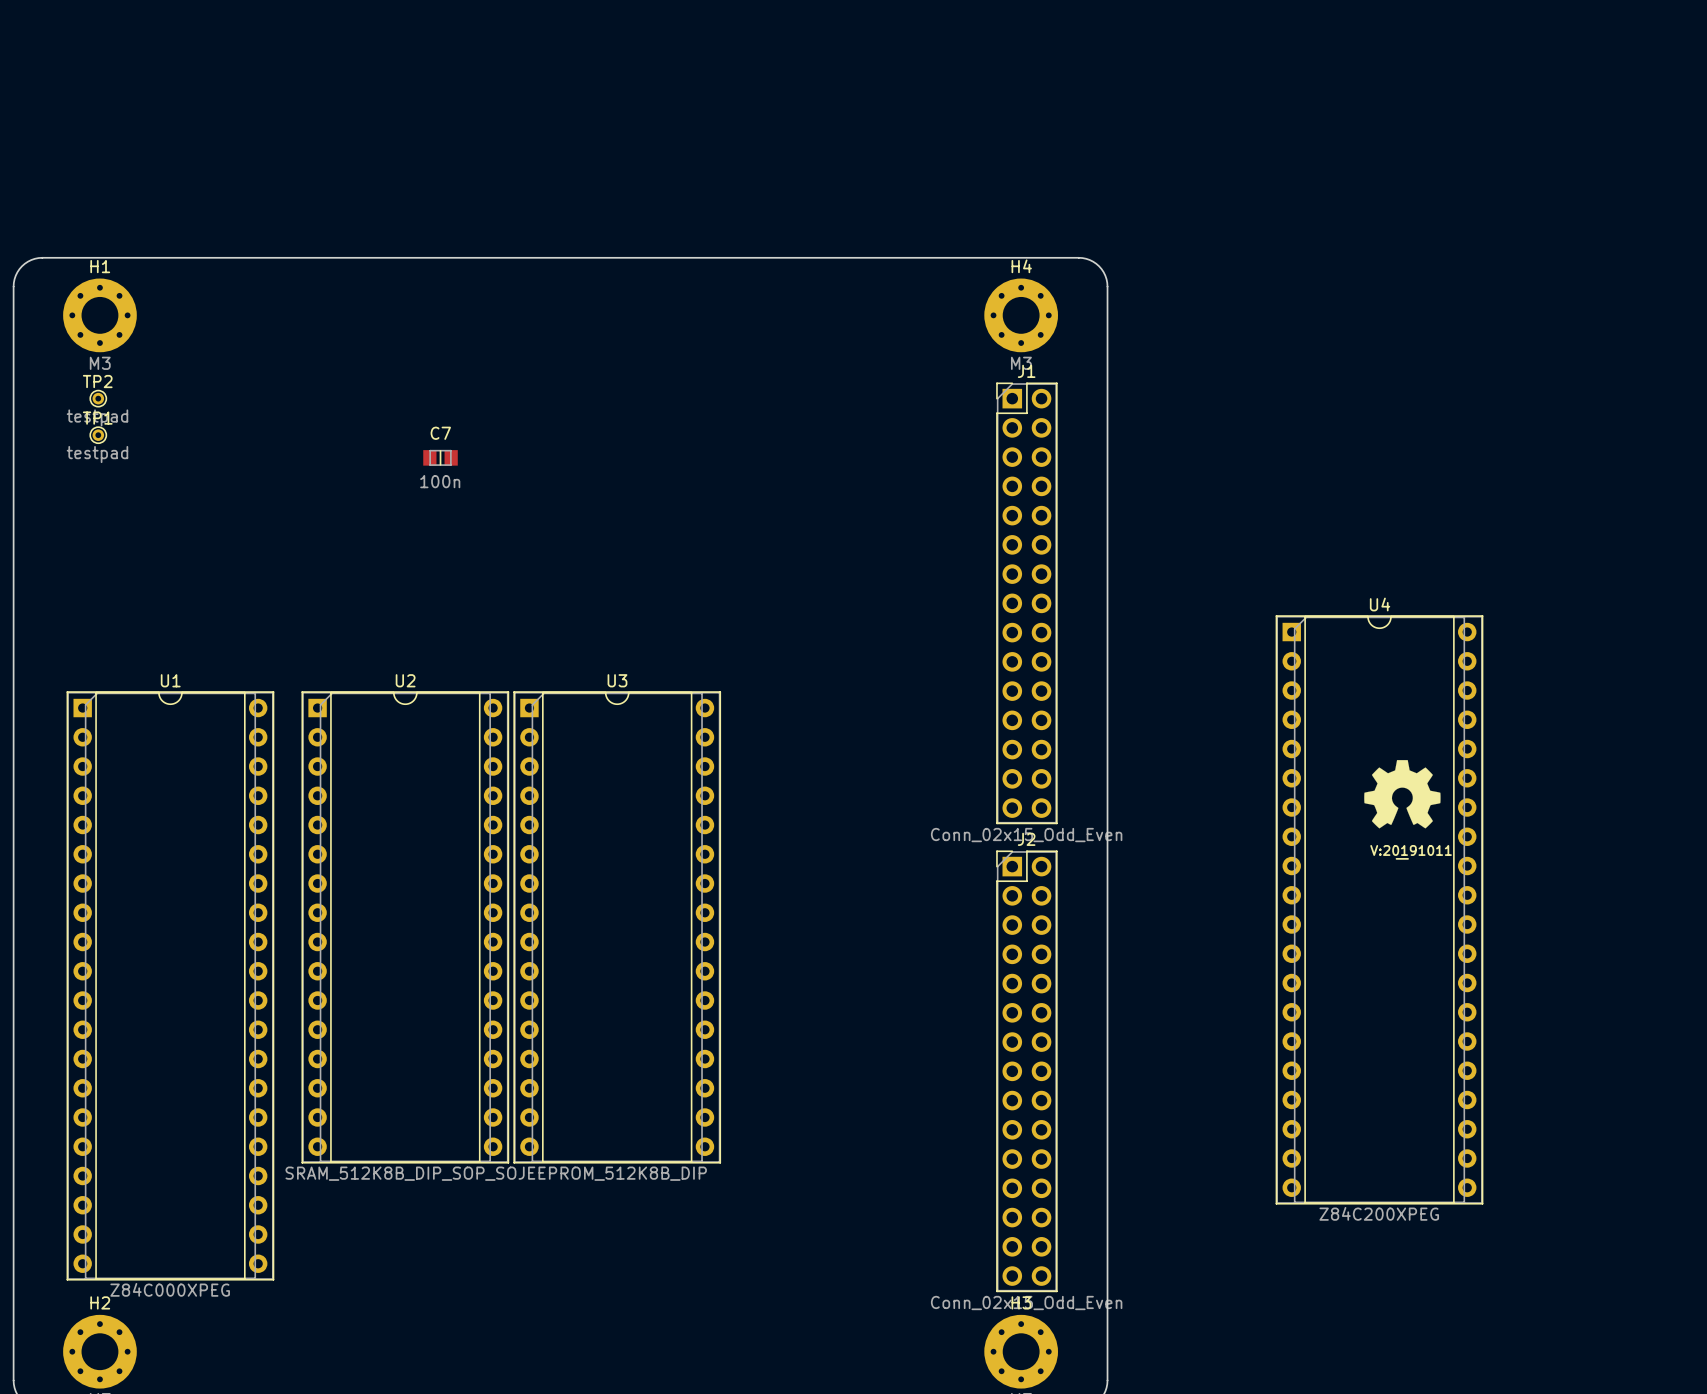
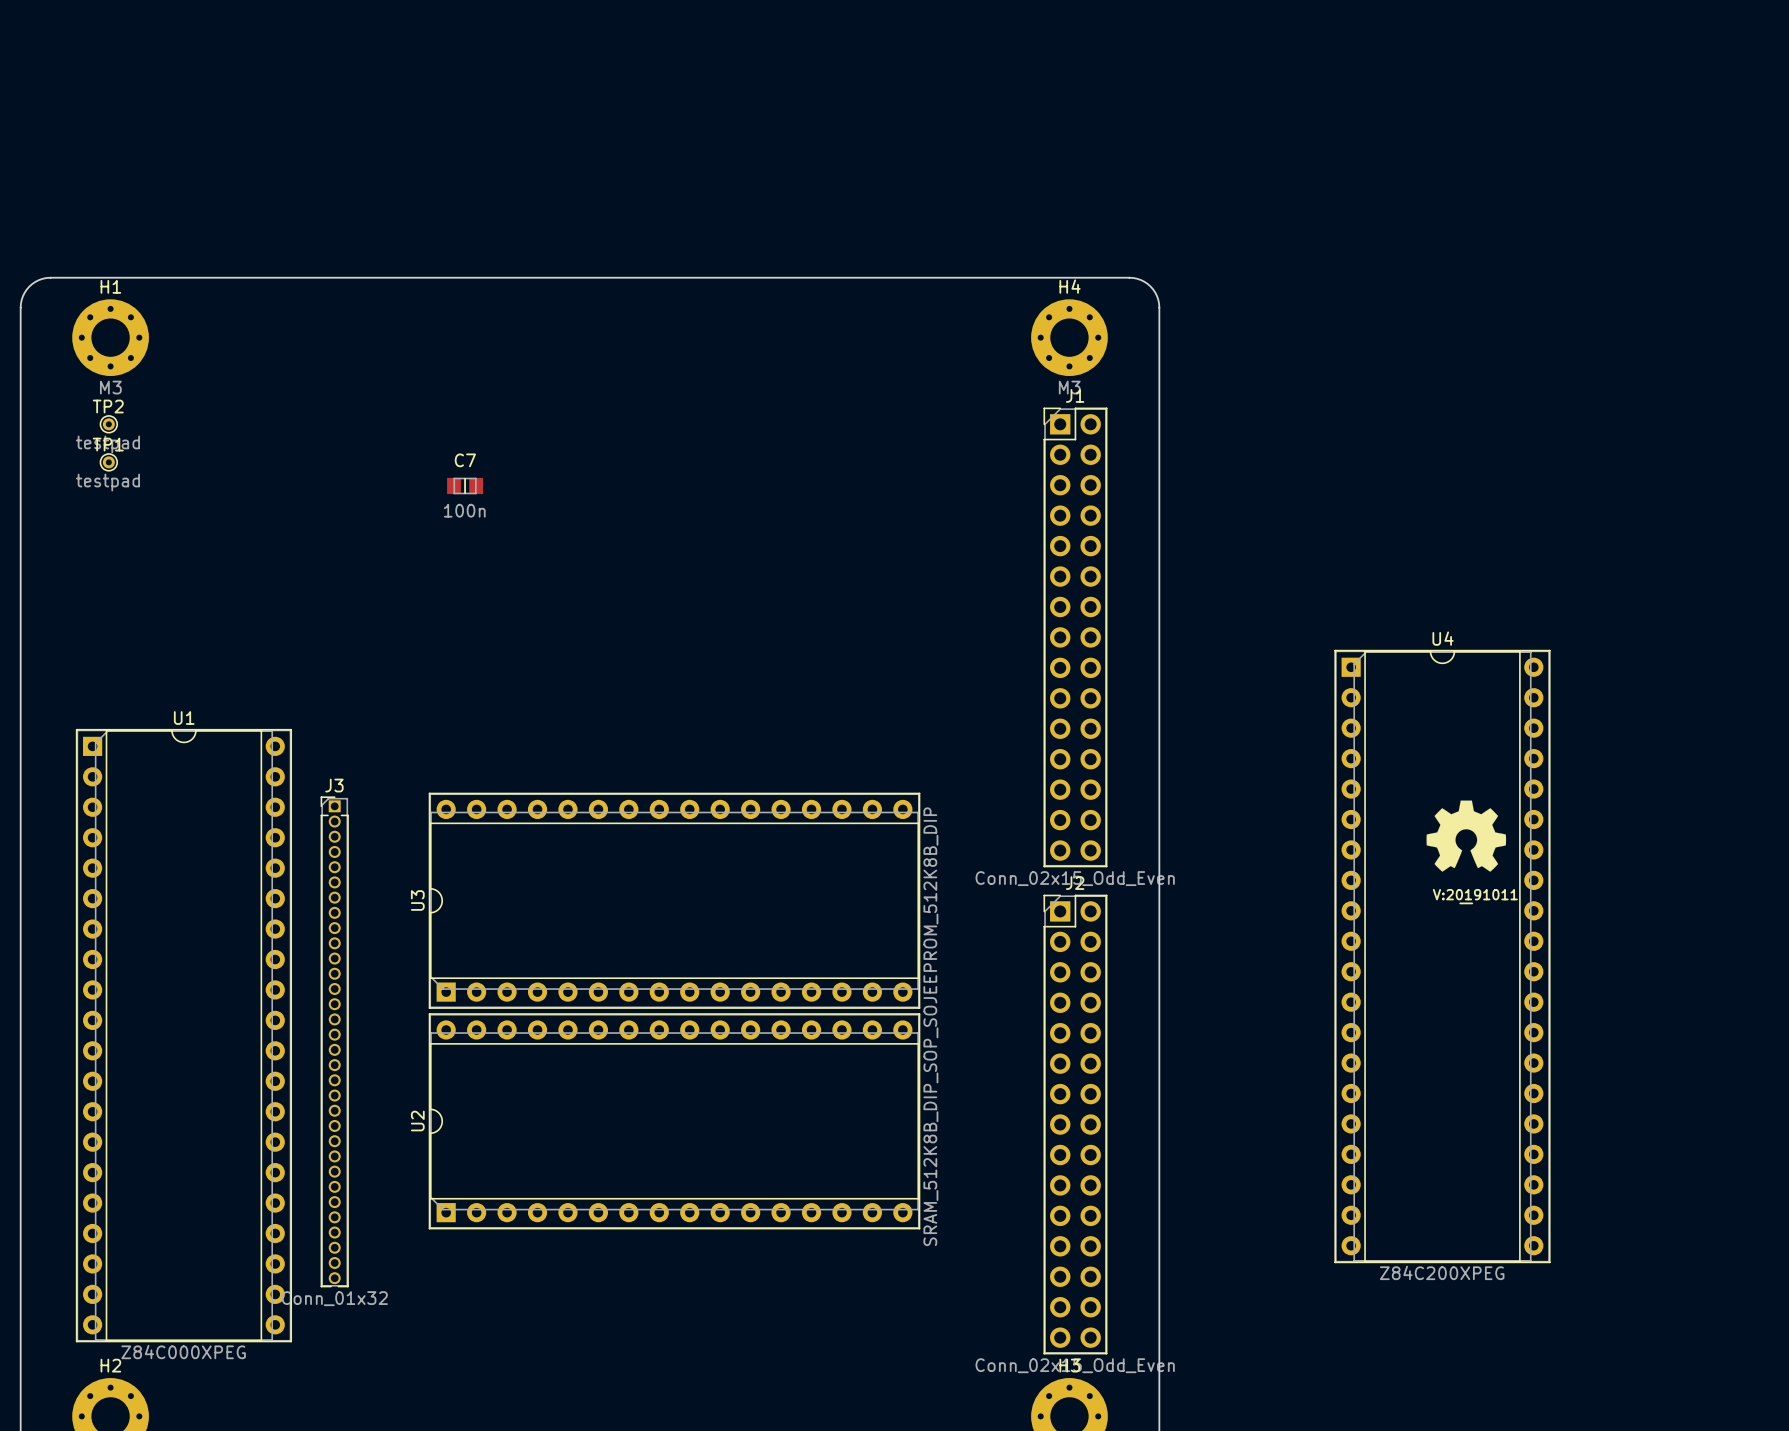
U2 rotation: 0° (405, 927) -> 90° counterclockwise (674, 1121)
U3 rotation: 0° (617, 927) -> 90° counterclockwise (674, 900)
J3: none -> Conn_01x32 (334, 1041)

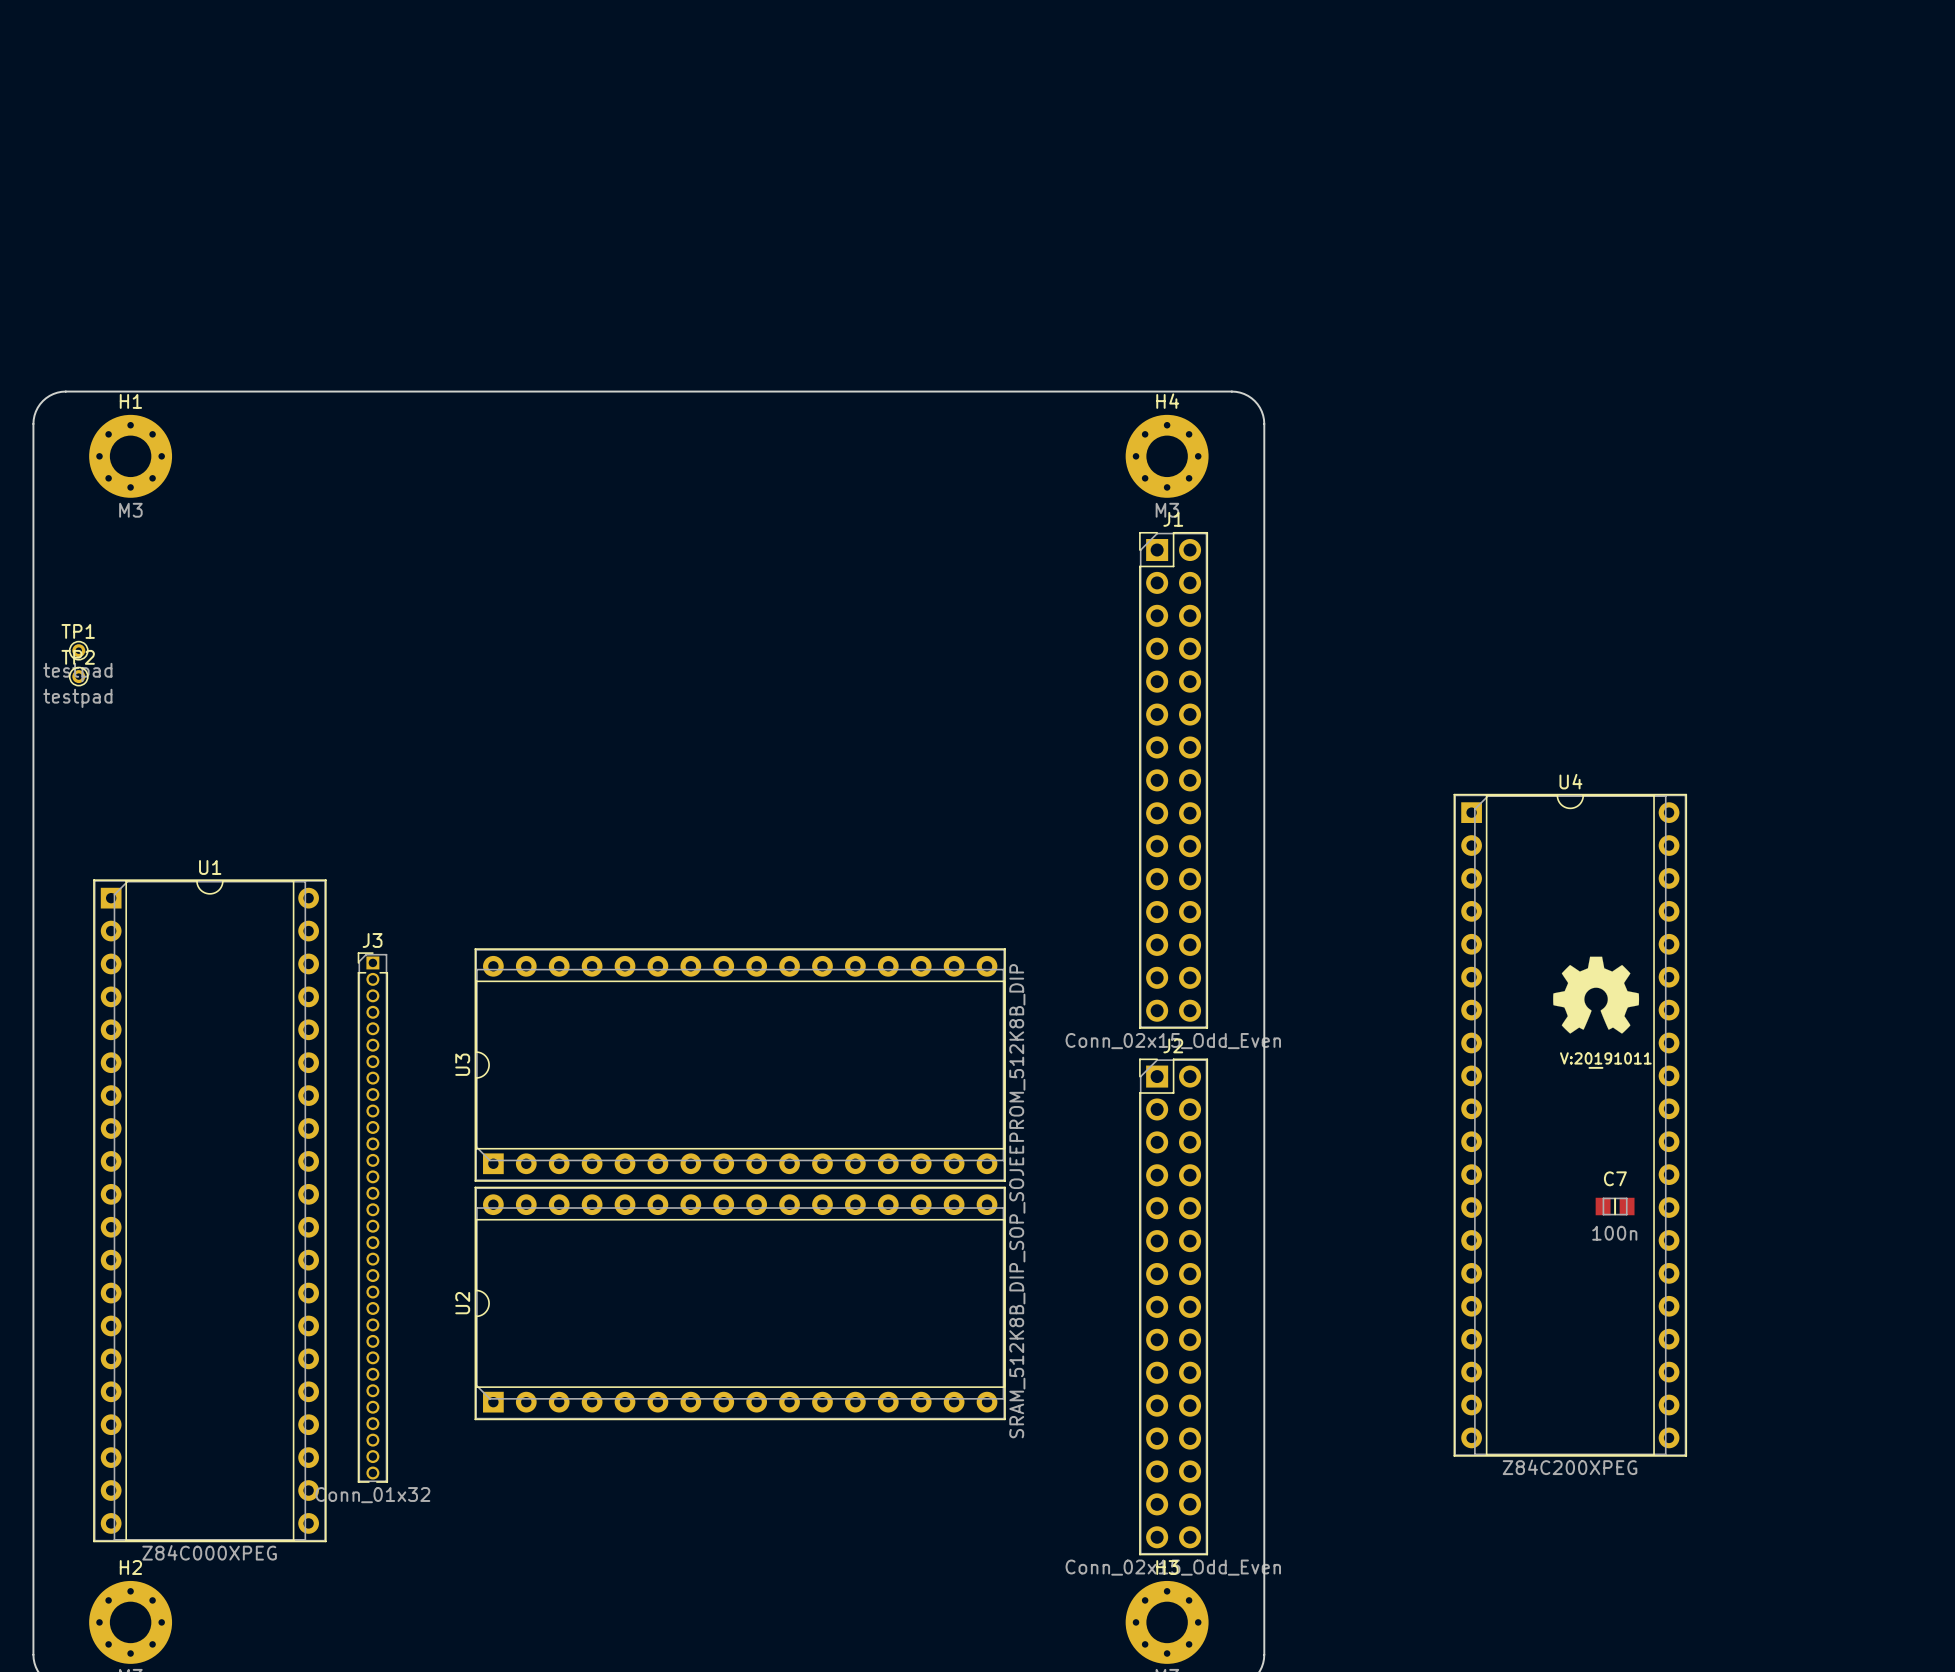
TP2 position: (108, 424) -> (78, 676)
TP1 position: (108, 462) -> (78, 650)
C7 position: (465, 485) -> (1615, 1206)

